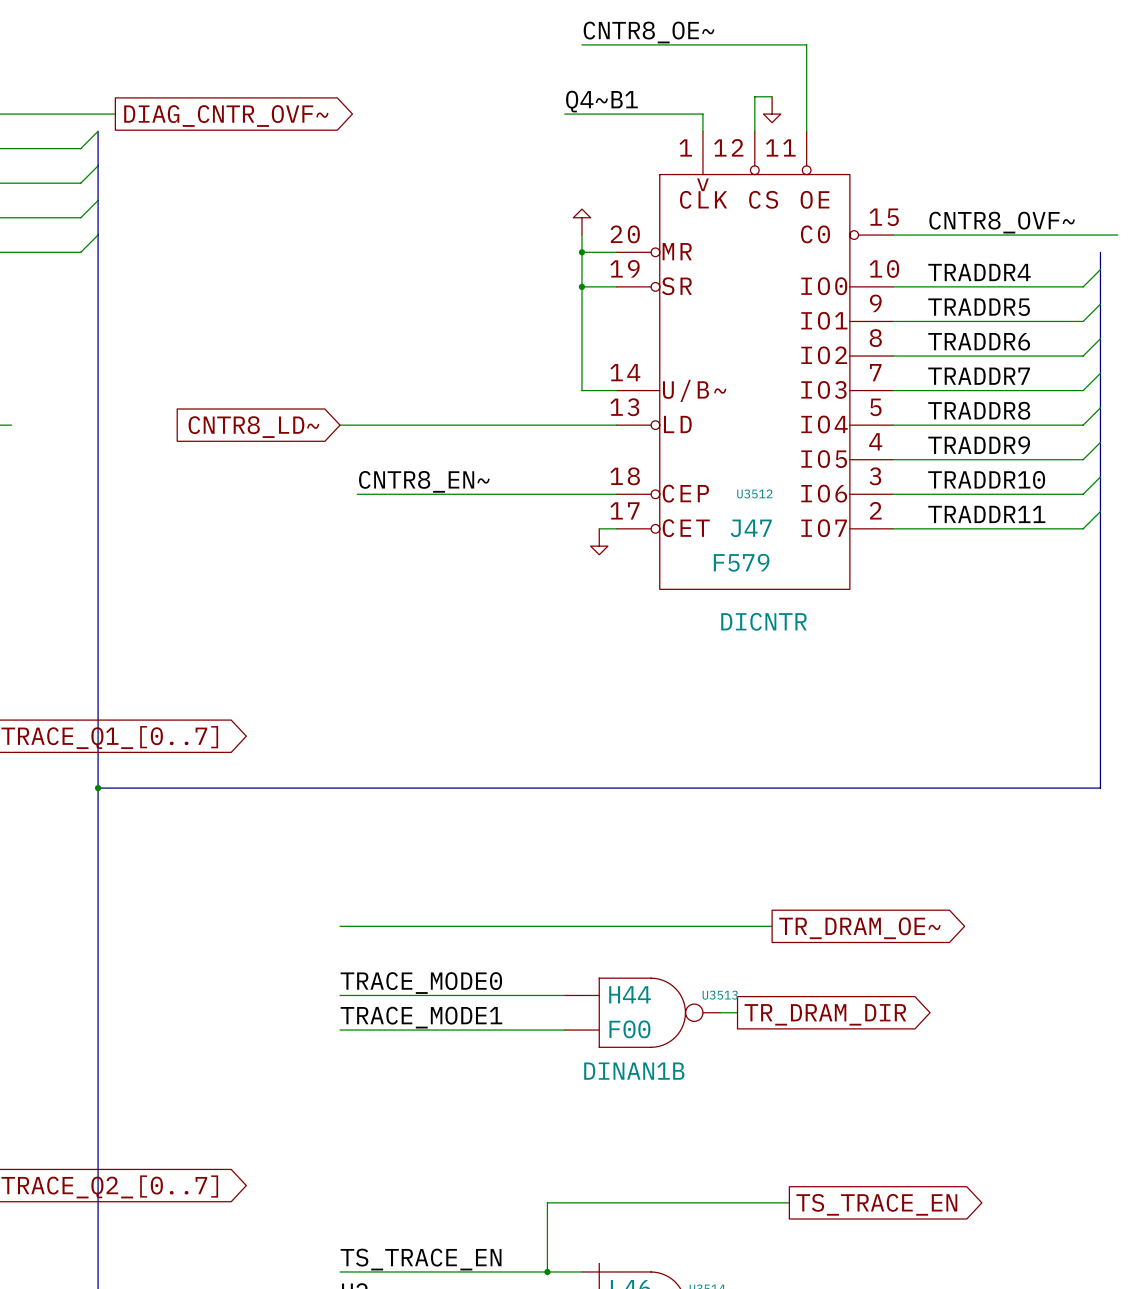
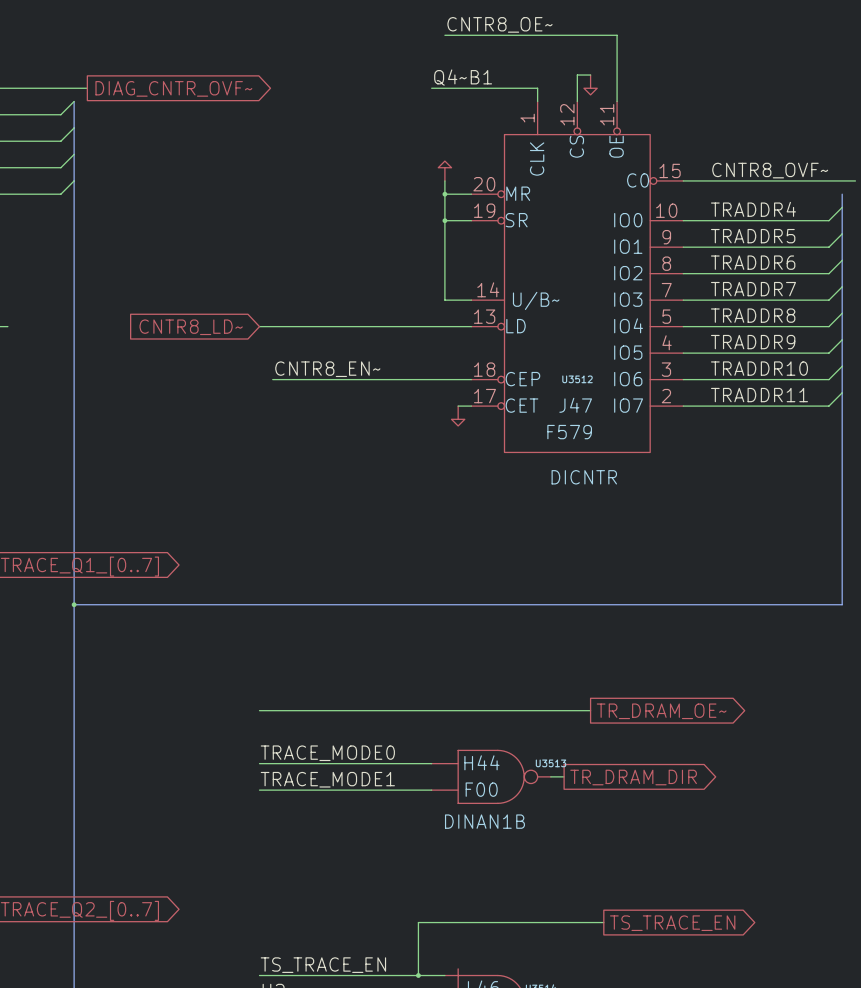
U3512 symbol: [616, 131, 894, 590] -> [471, 101, 684, 453]

